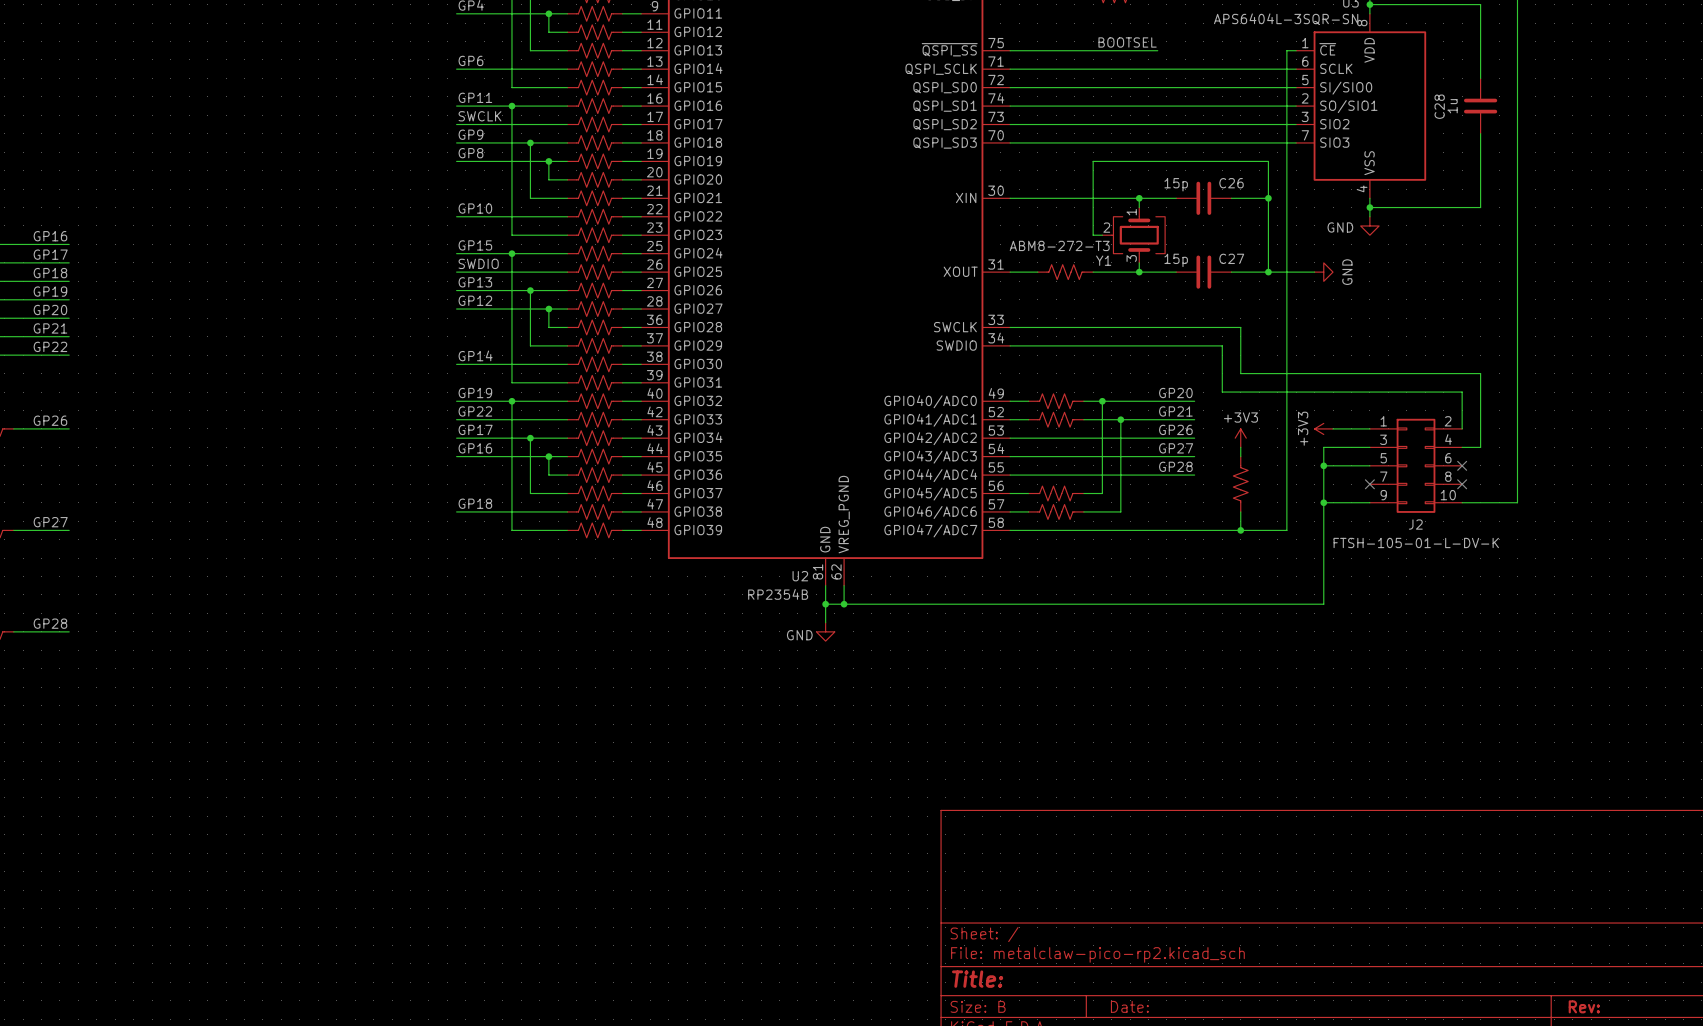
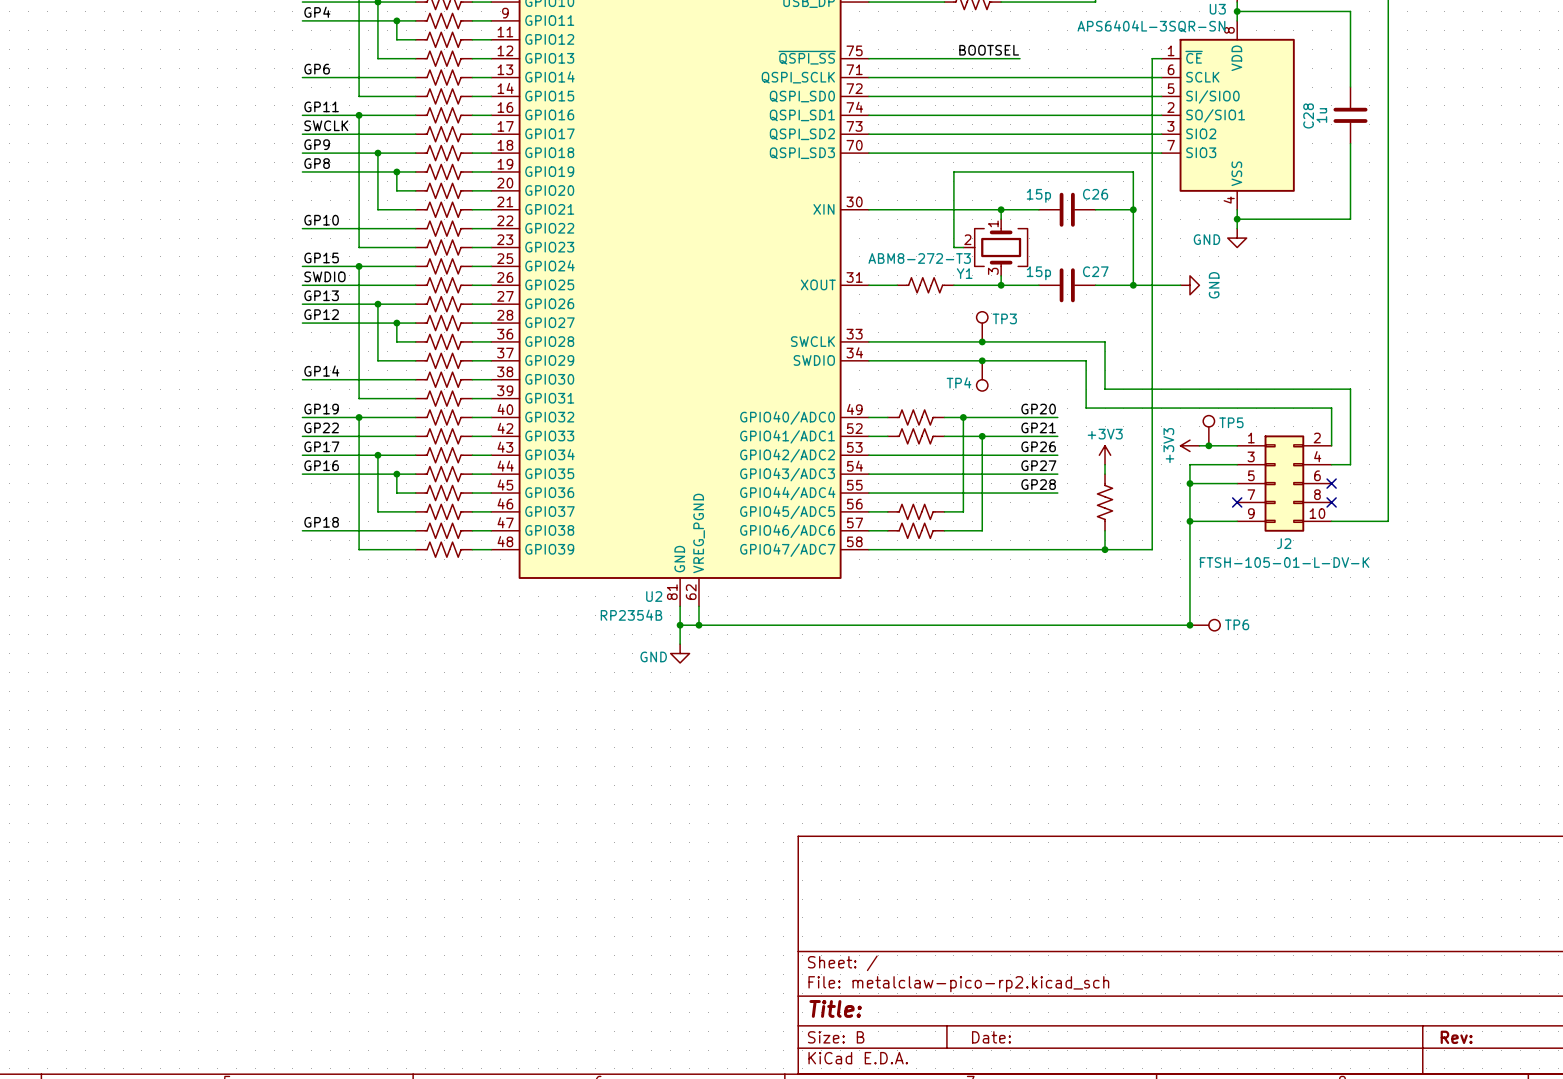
TP3: none -> (982, 326)
junction: none -> (982, 341)
junction: none -> (982, 360)
TP4: none -> (982, 375)
TP5: none -> (1208, 430)
junction: none -> (1208, 445)
junction: none -> (1189, 625)
TP6: none -> (1205, 625)

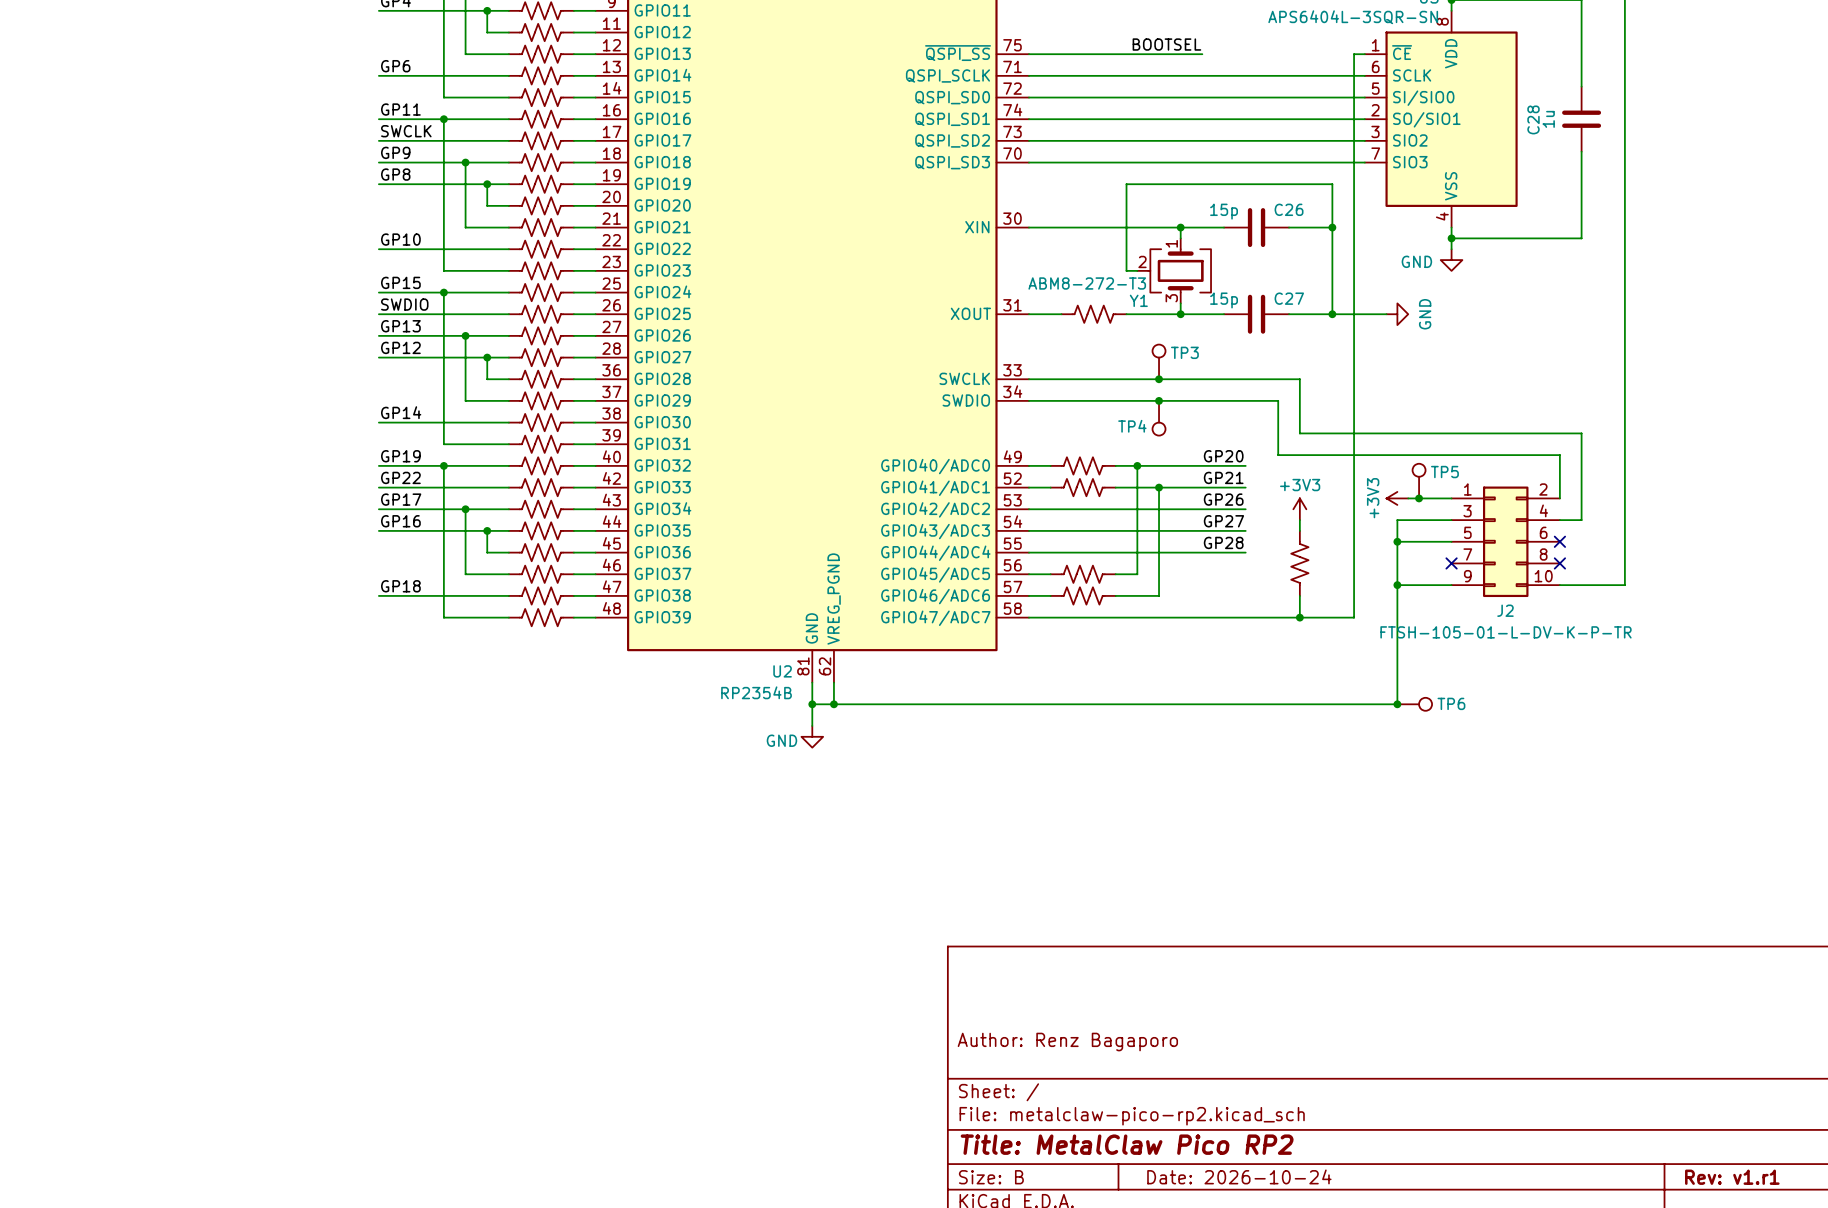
J2 value: FTSH-105-01-L-DV-K (1284, 562) -> FTSH-105-01-L-DV-K-P-TR (1506, 632)
title block: none -> Author: Renz Bagaporo (1067, 1042)
title block: Title: (835, 1008) -> Title: MetalClaw Pico RP2 (1127, 1144)
title block: Date: (991, 1037) -> Date: 2026-10-24 (1239, 1176)
title block: Rev: (1456, 1037) -> Rev: v1.r1 (1732, 1177)

